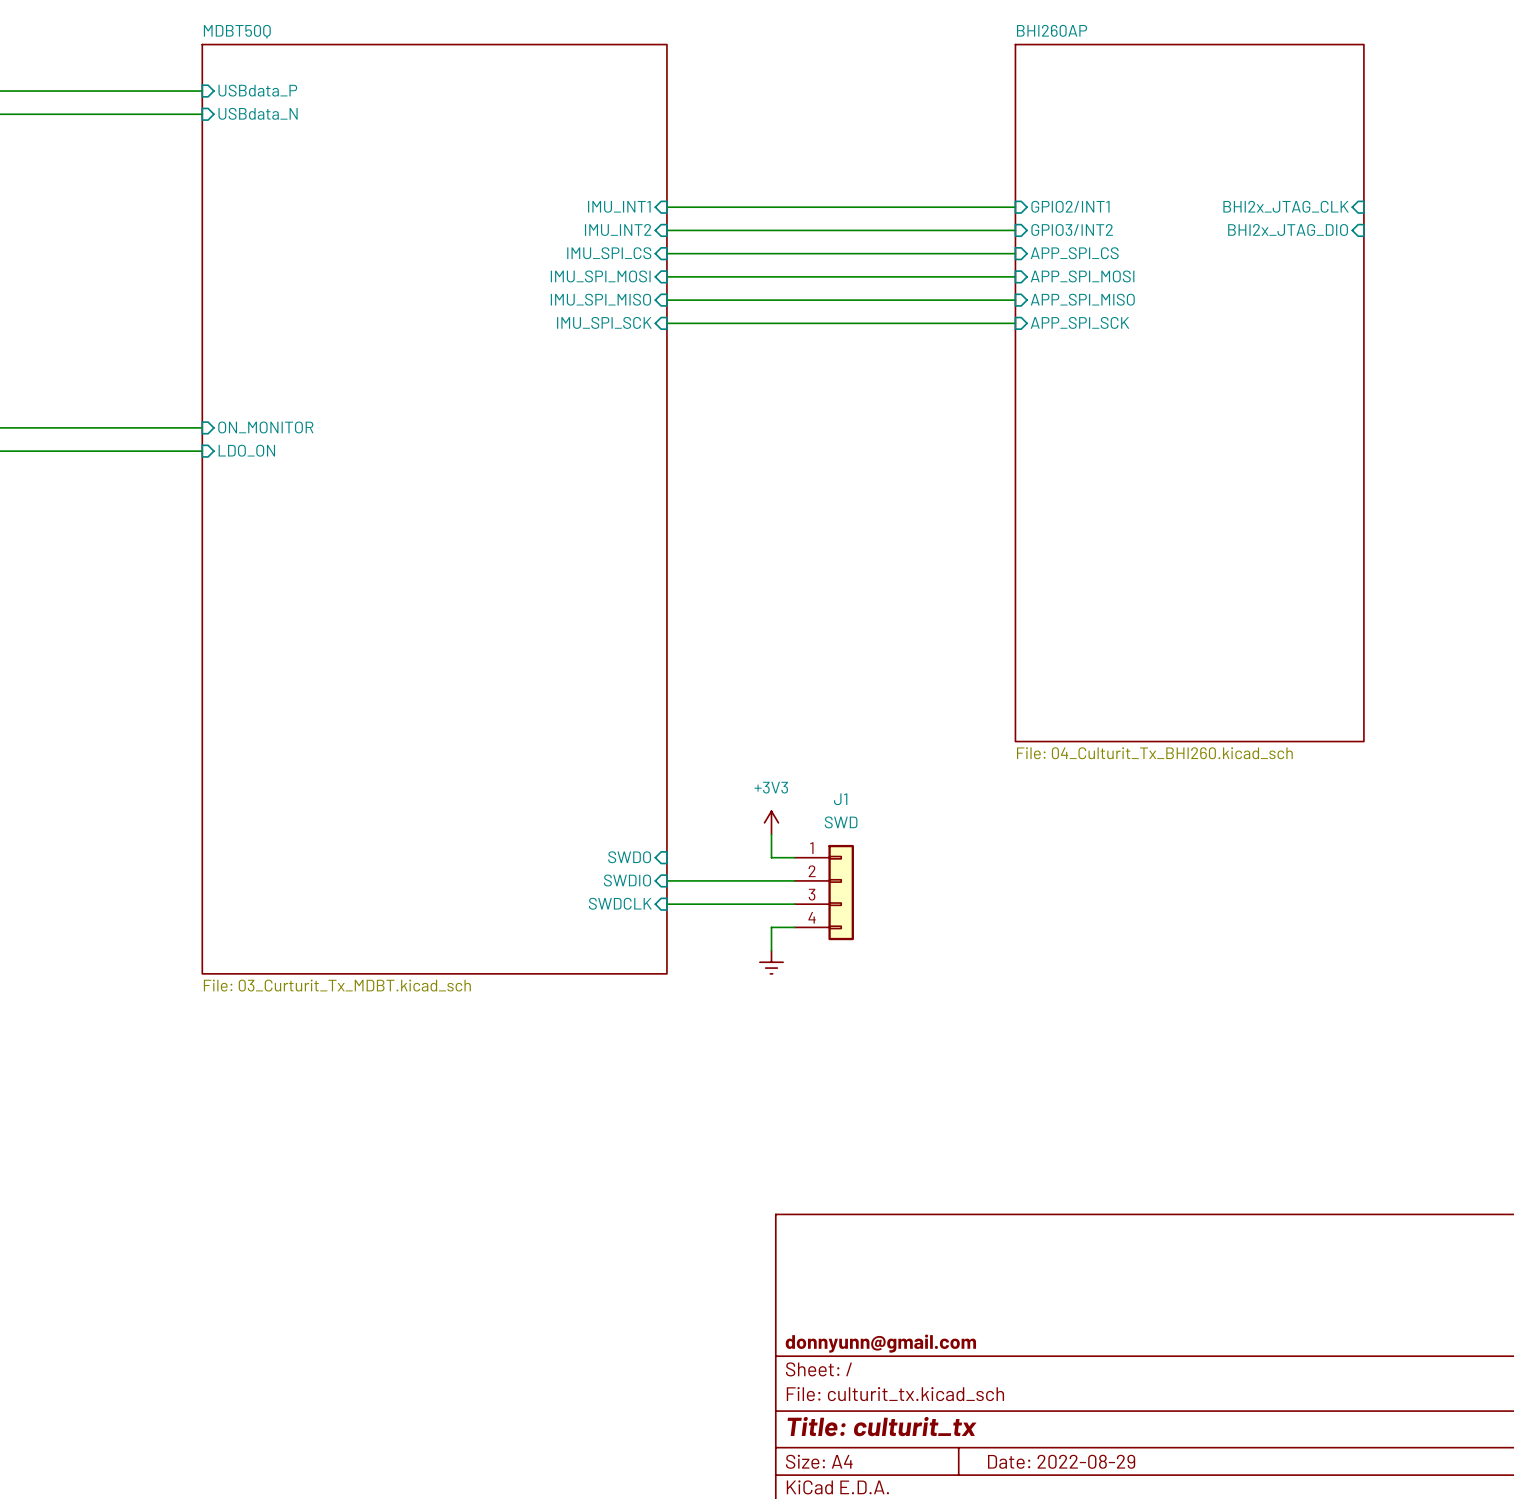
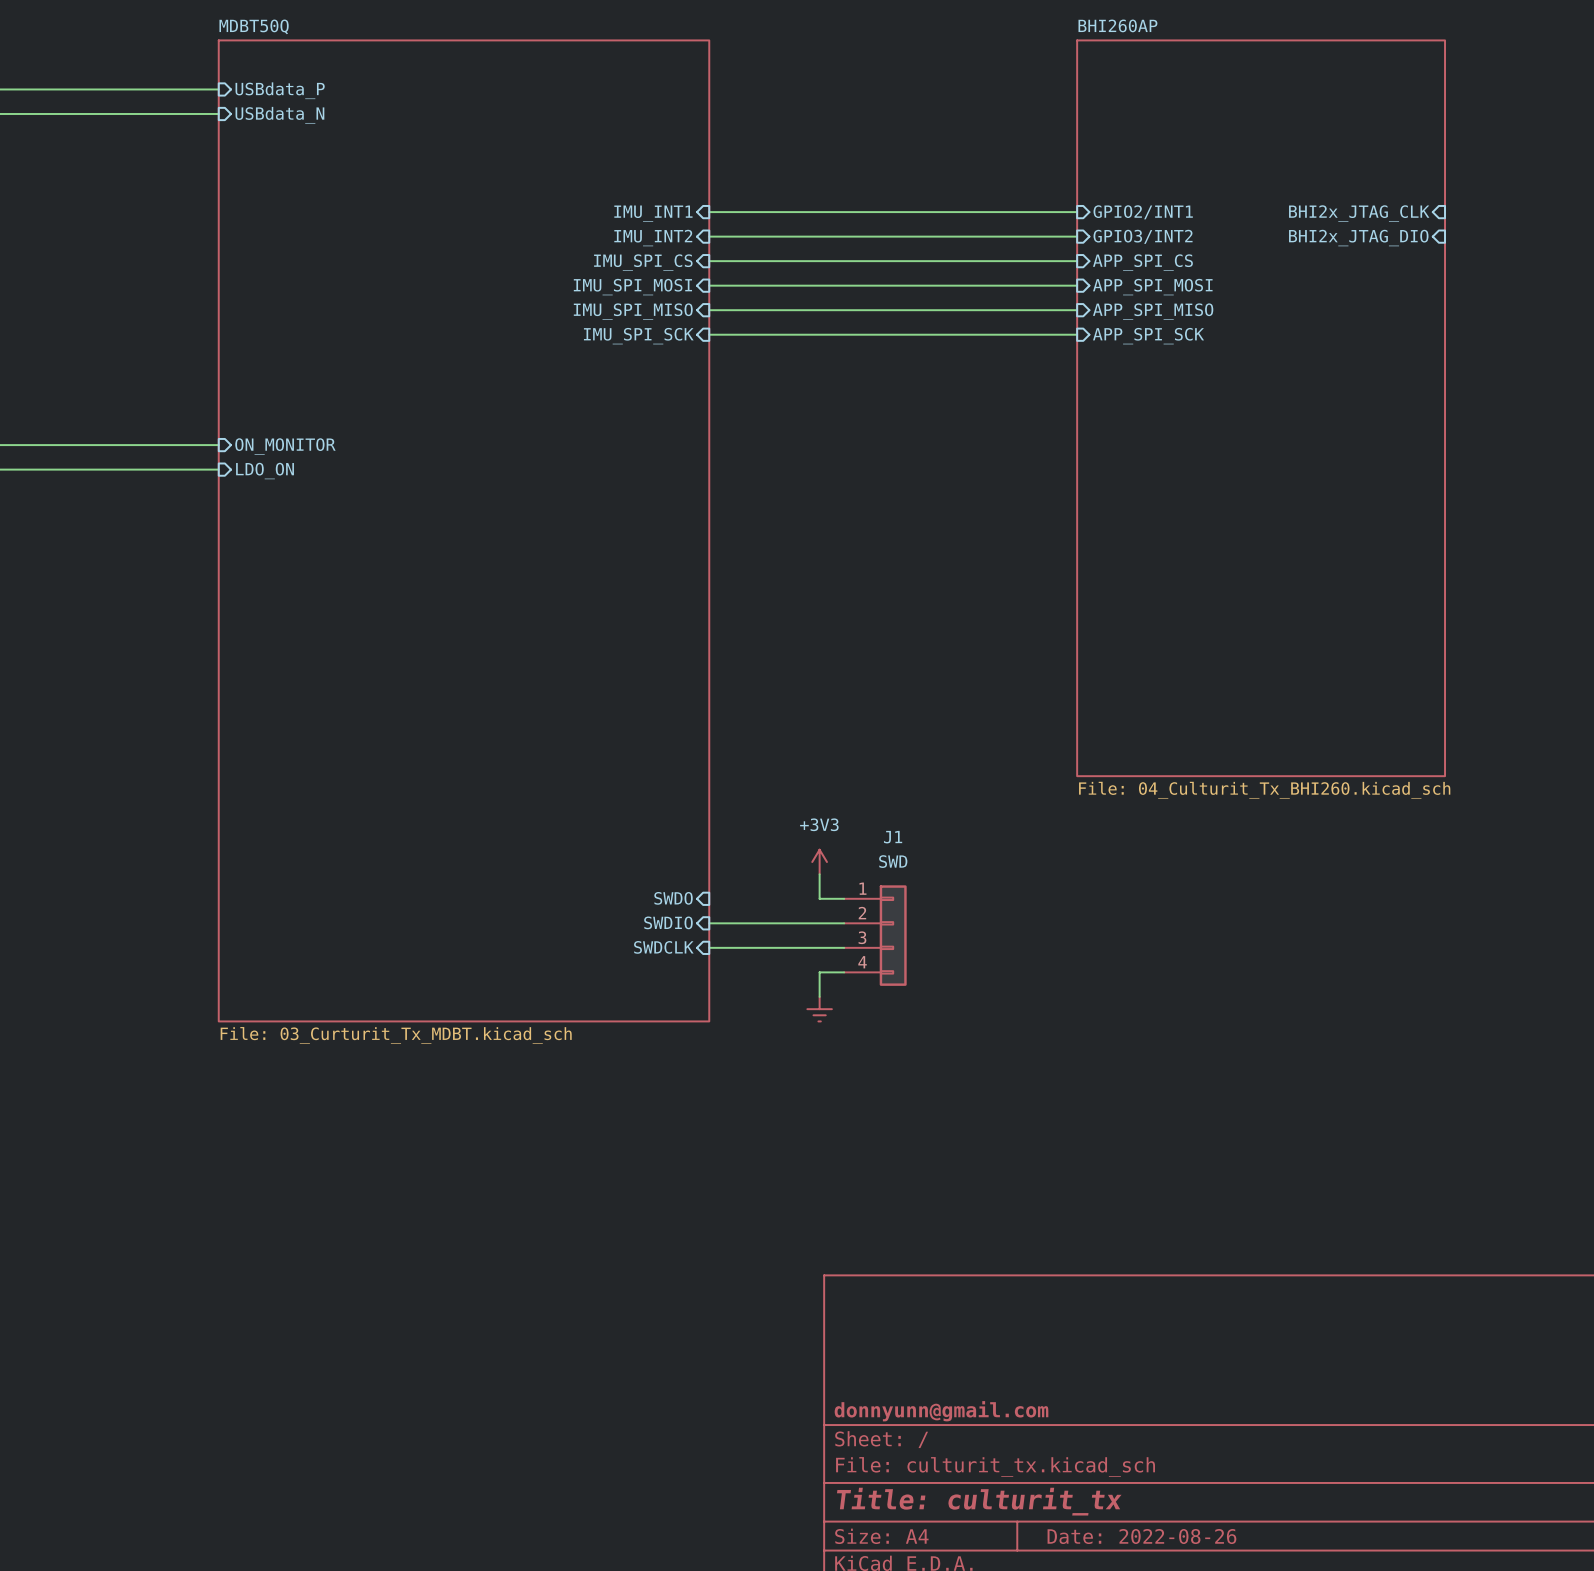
title block: Date: 2022-08-29 (1061, 1461) -> Date: 2022-08-26 (1141, 1536)

